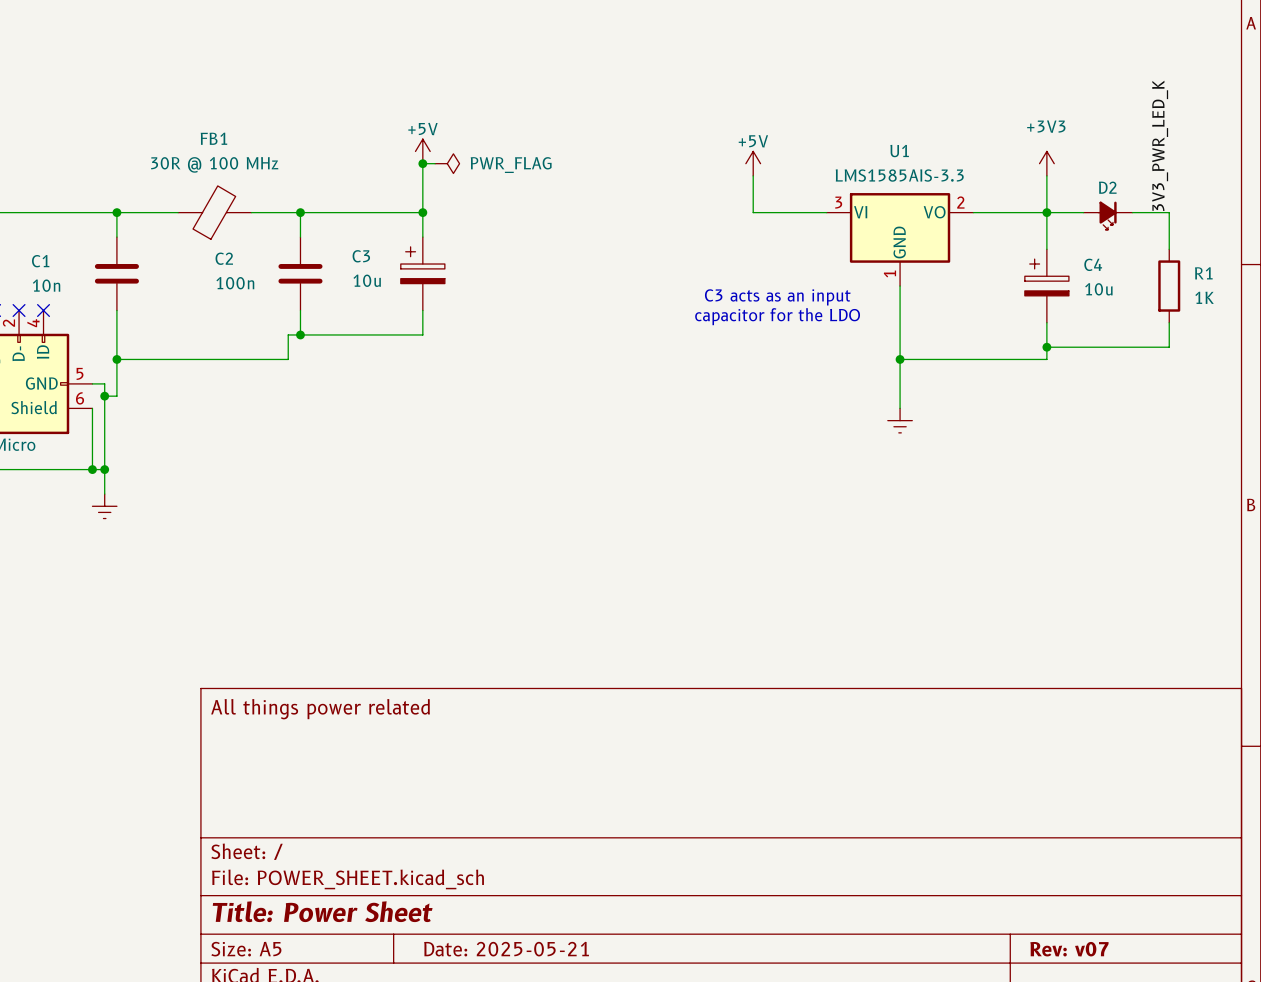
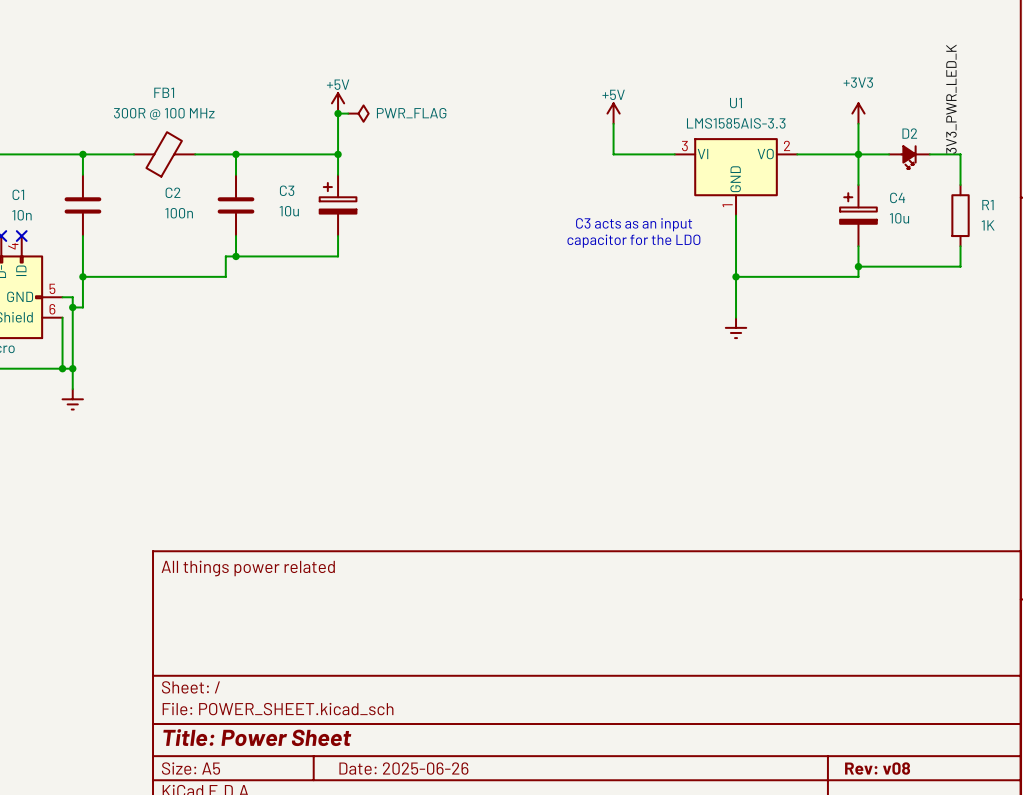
FB1 value: 30R @ 100 MHz (214, 164) -> 300R @ 100 MHz (164, 113)
title block: Date: 2025-05-21 (506, 949) -> Date: 2025-06-26 (403, 768)
title block: Rev: v07 (1069, 949) -> Rev: v08 (877, 768)

